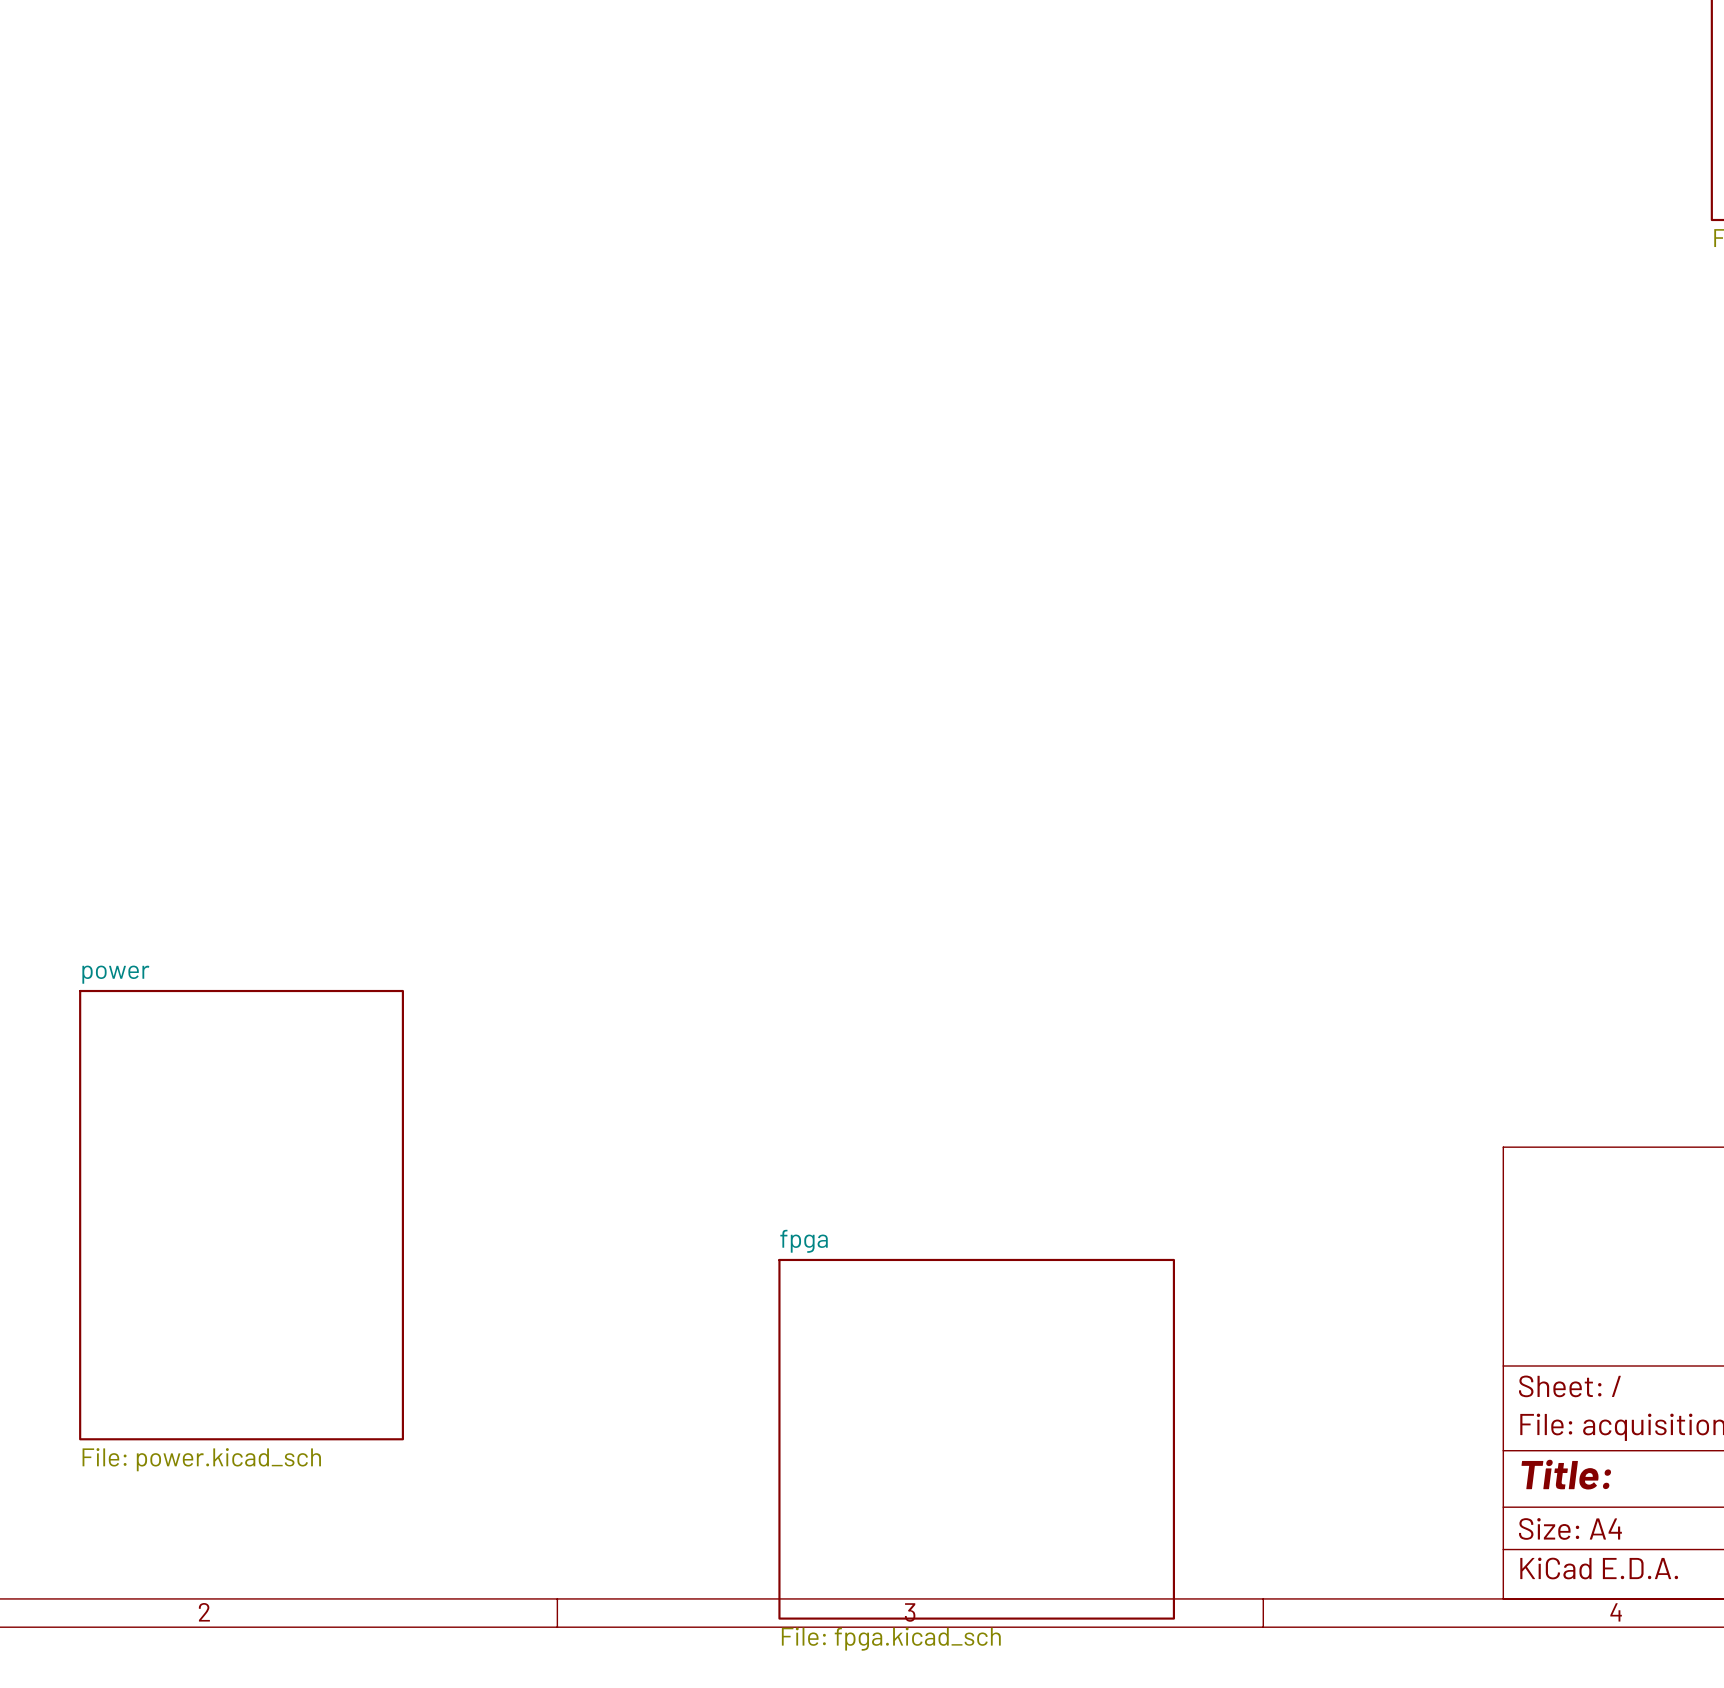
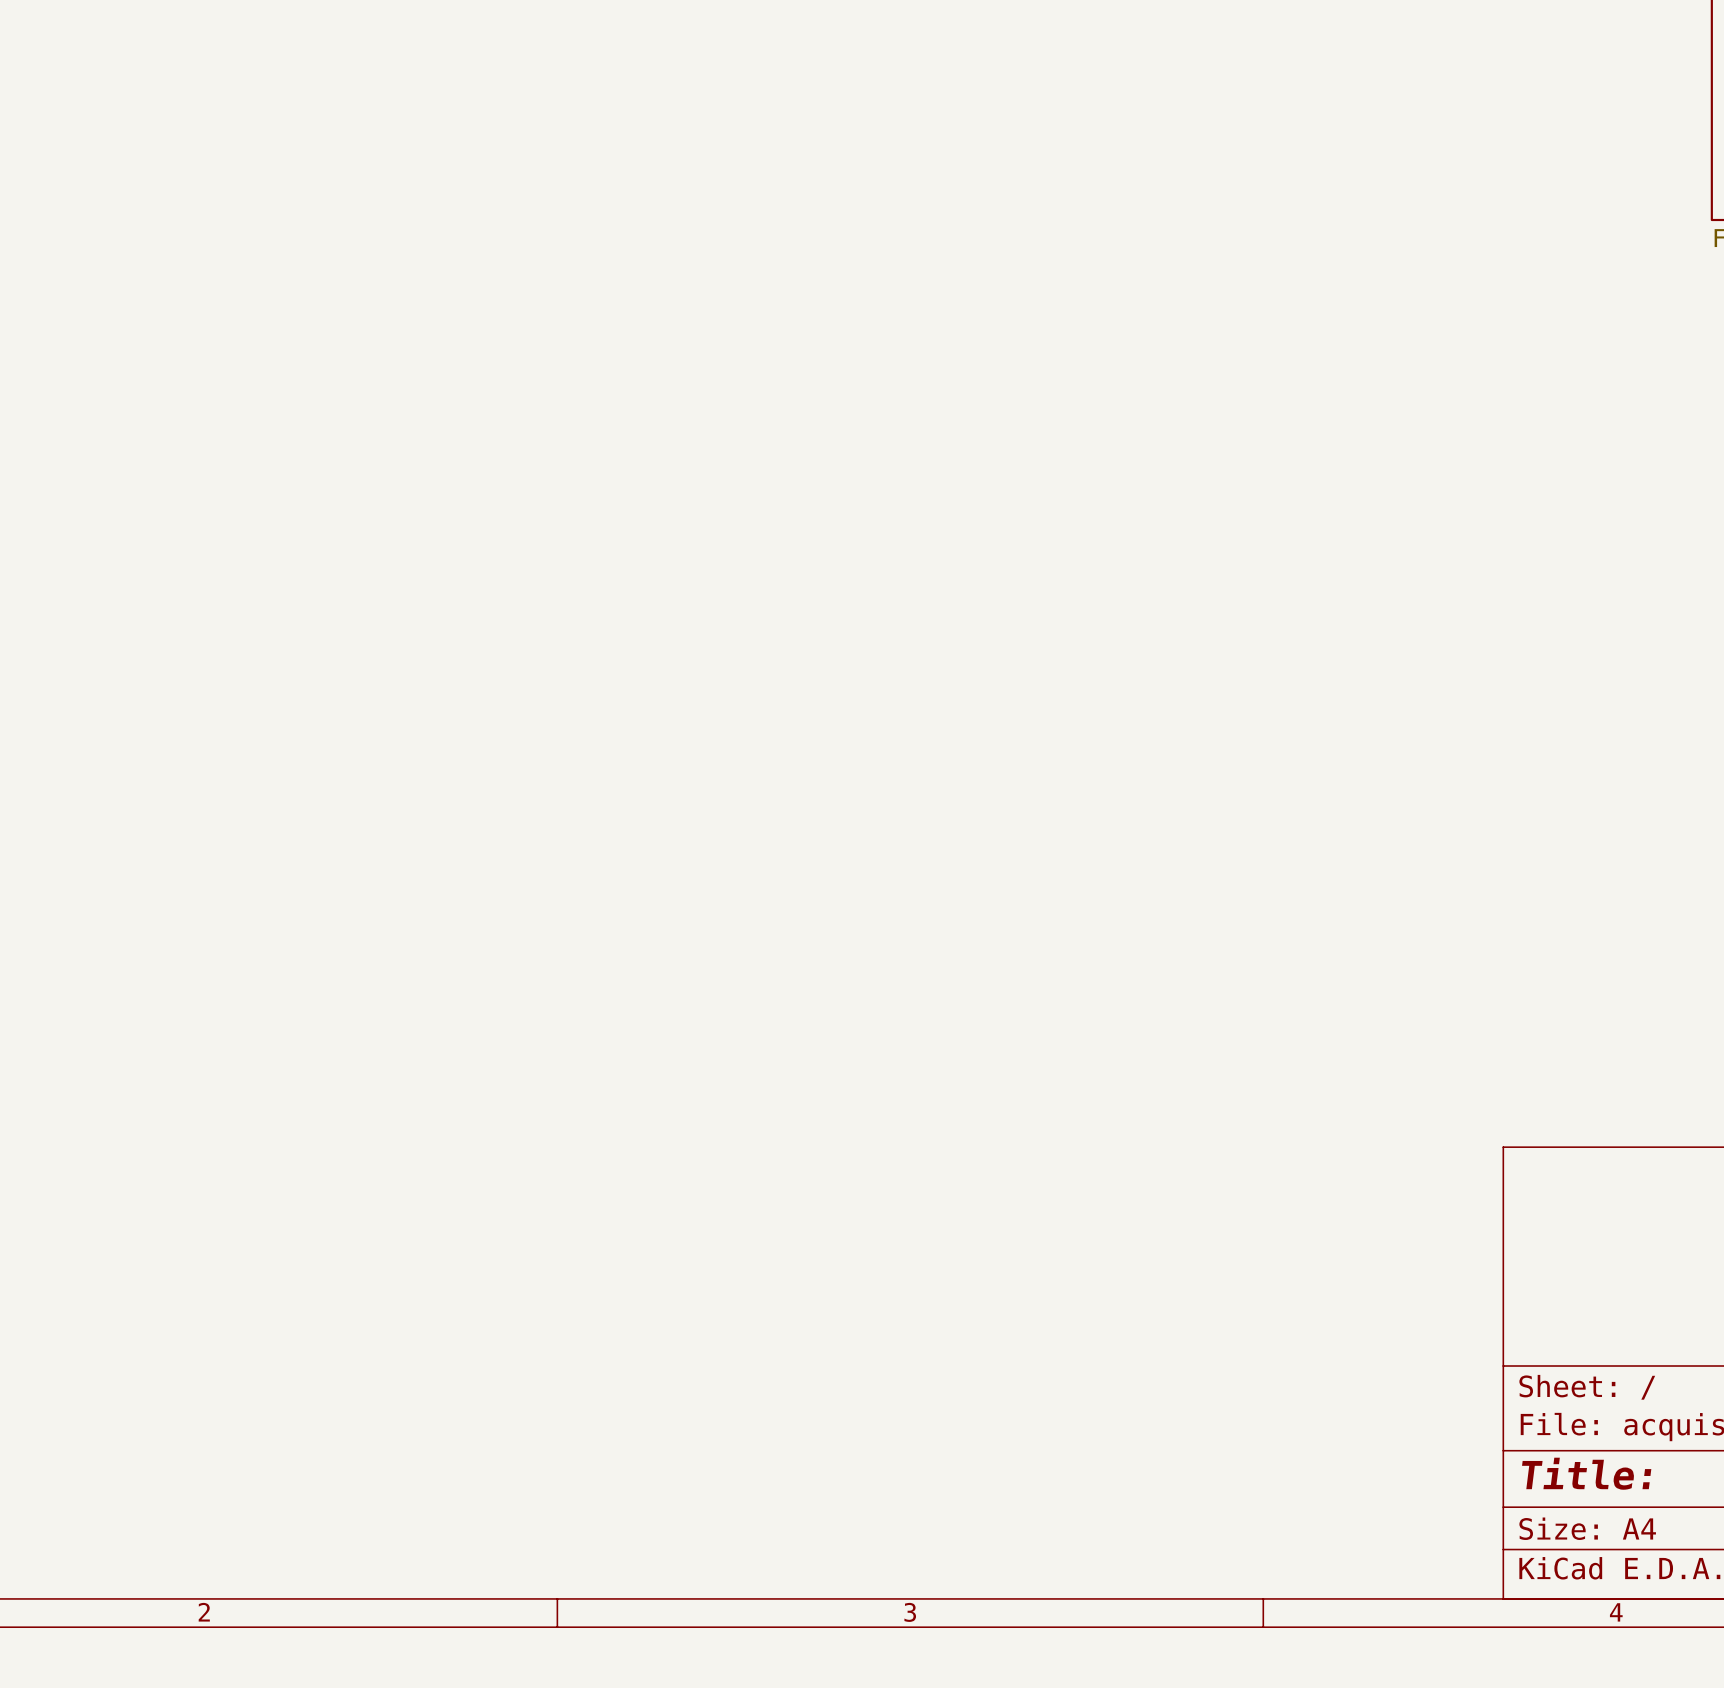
sheet power: File: power.kicad_sch (241, 1215) -> none
sheet fpga: File: fpga.kicad_sch (976, 1439) -> none

